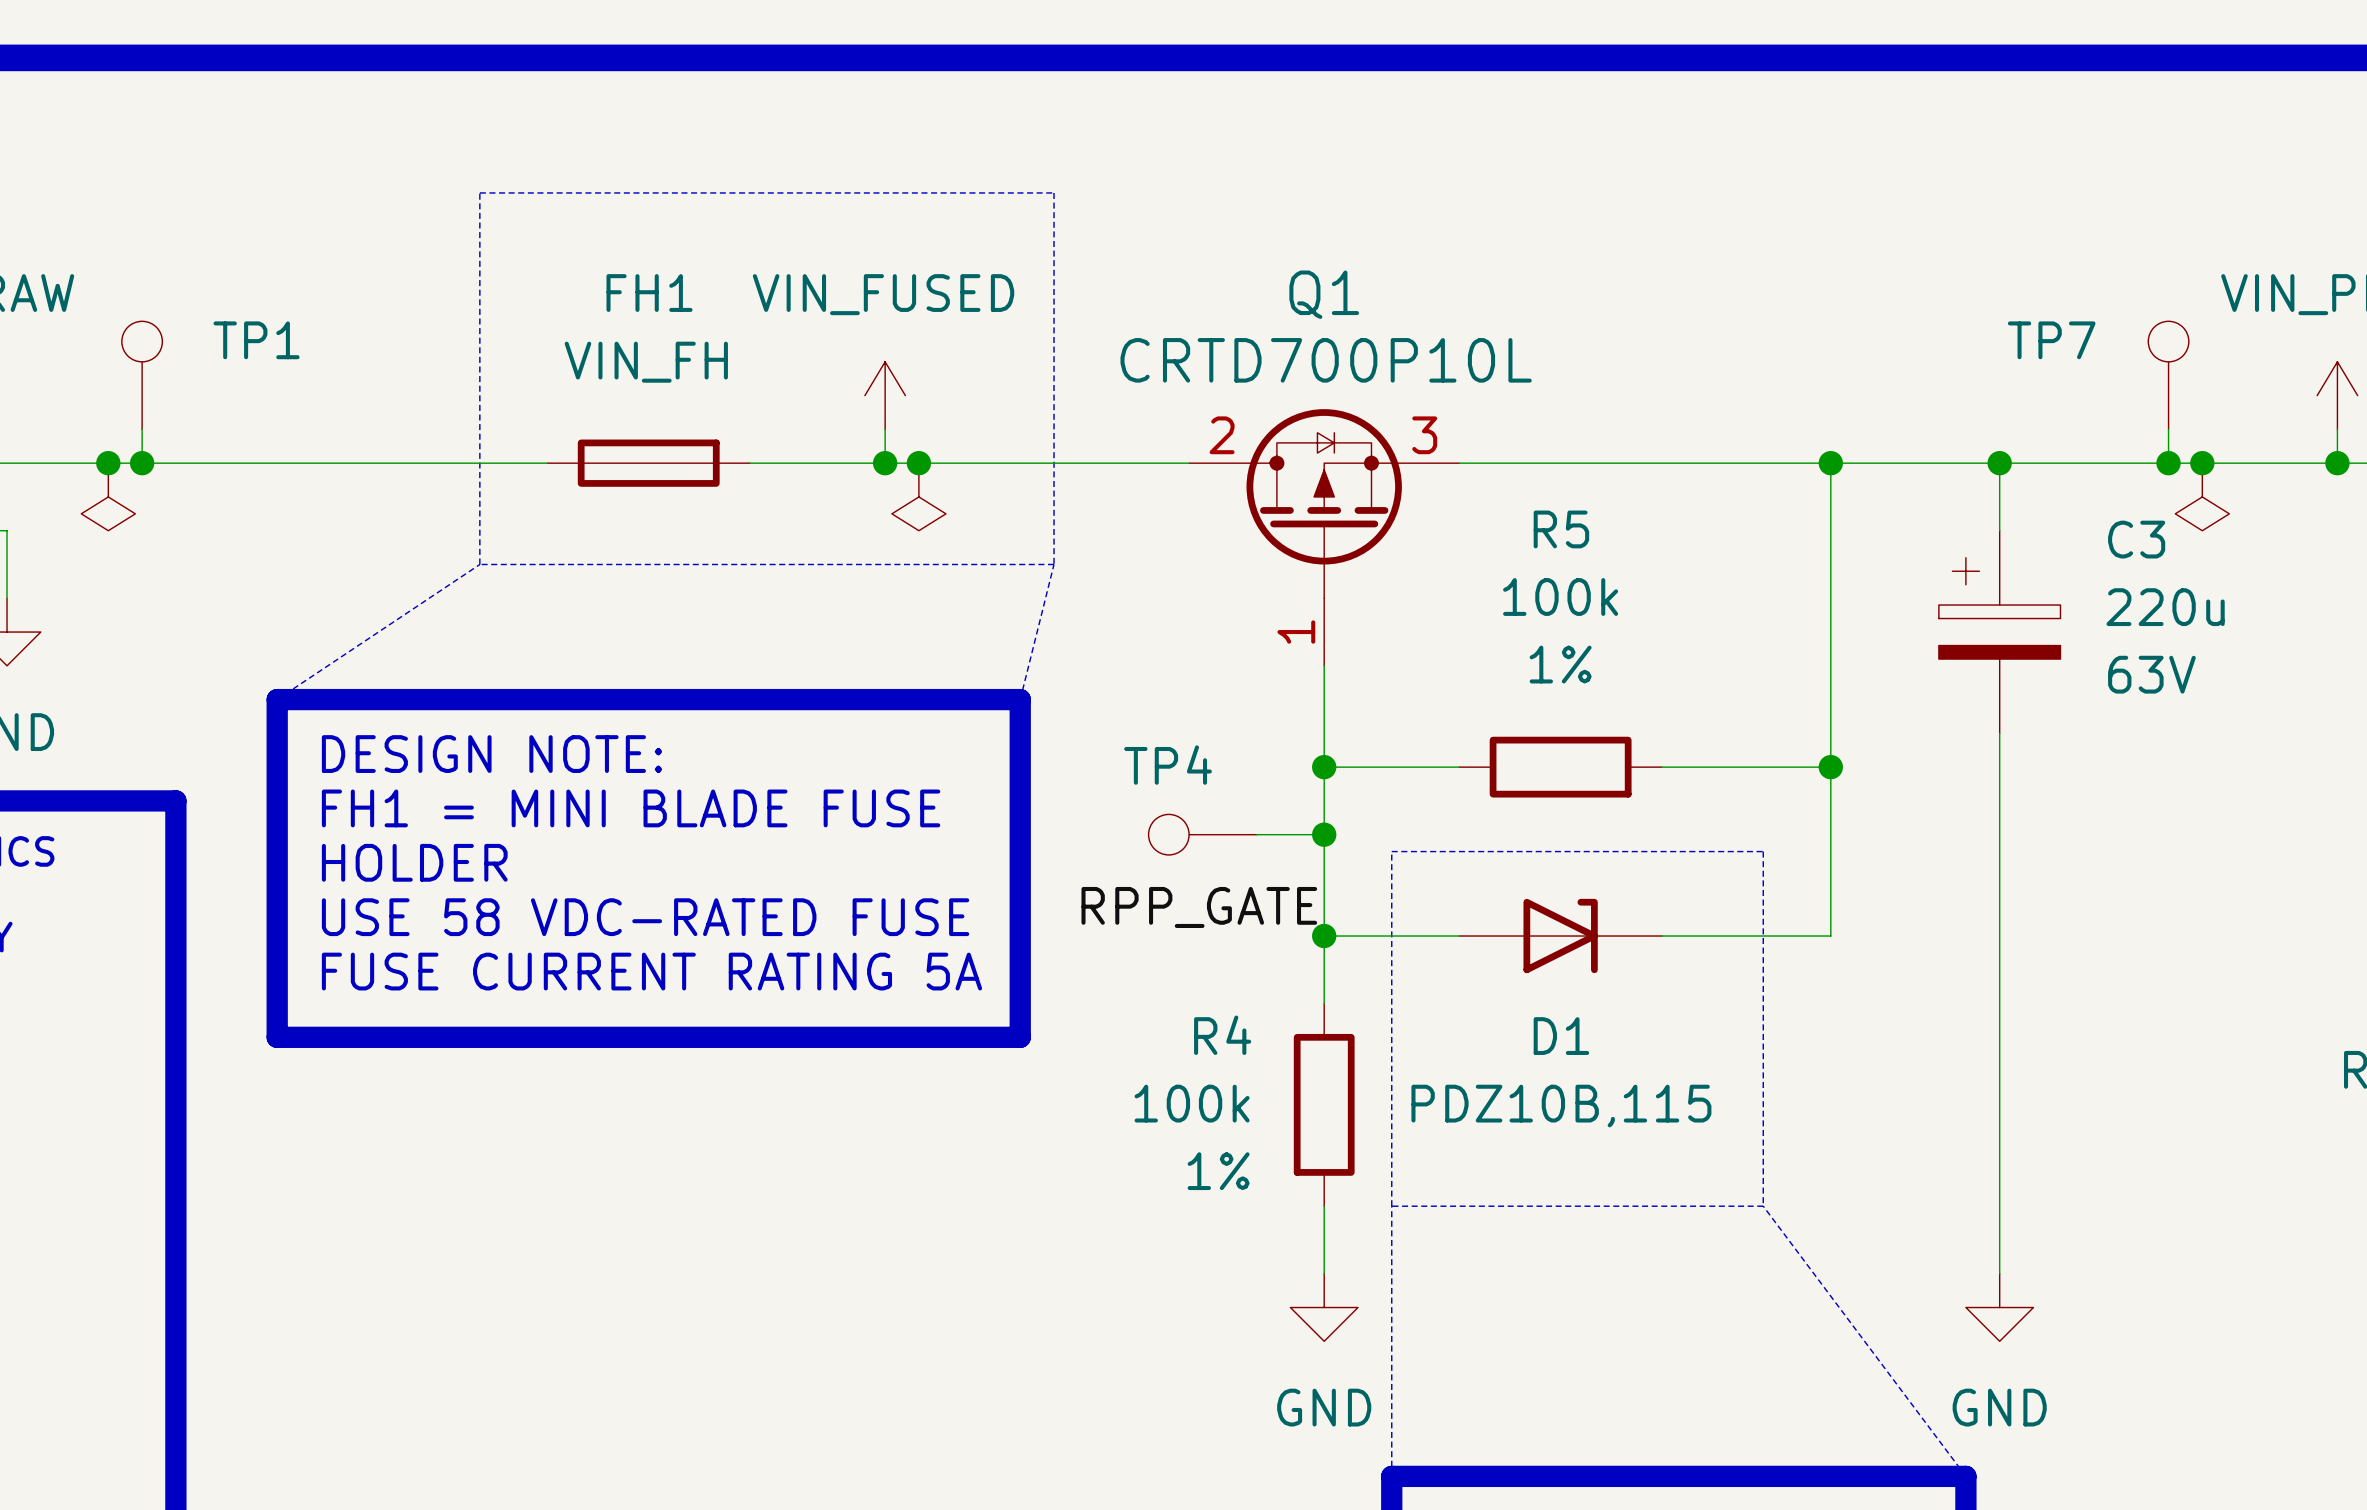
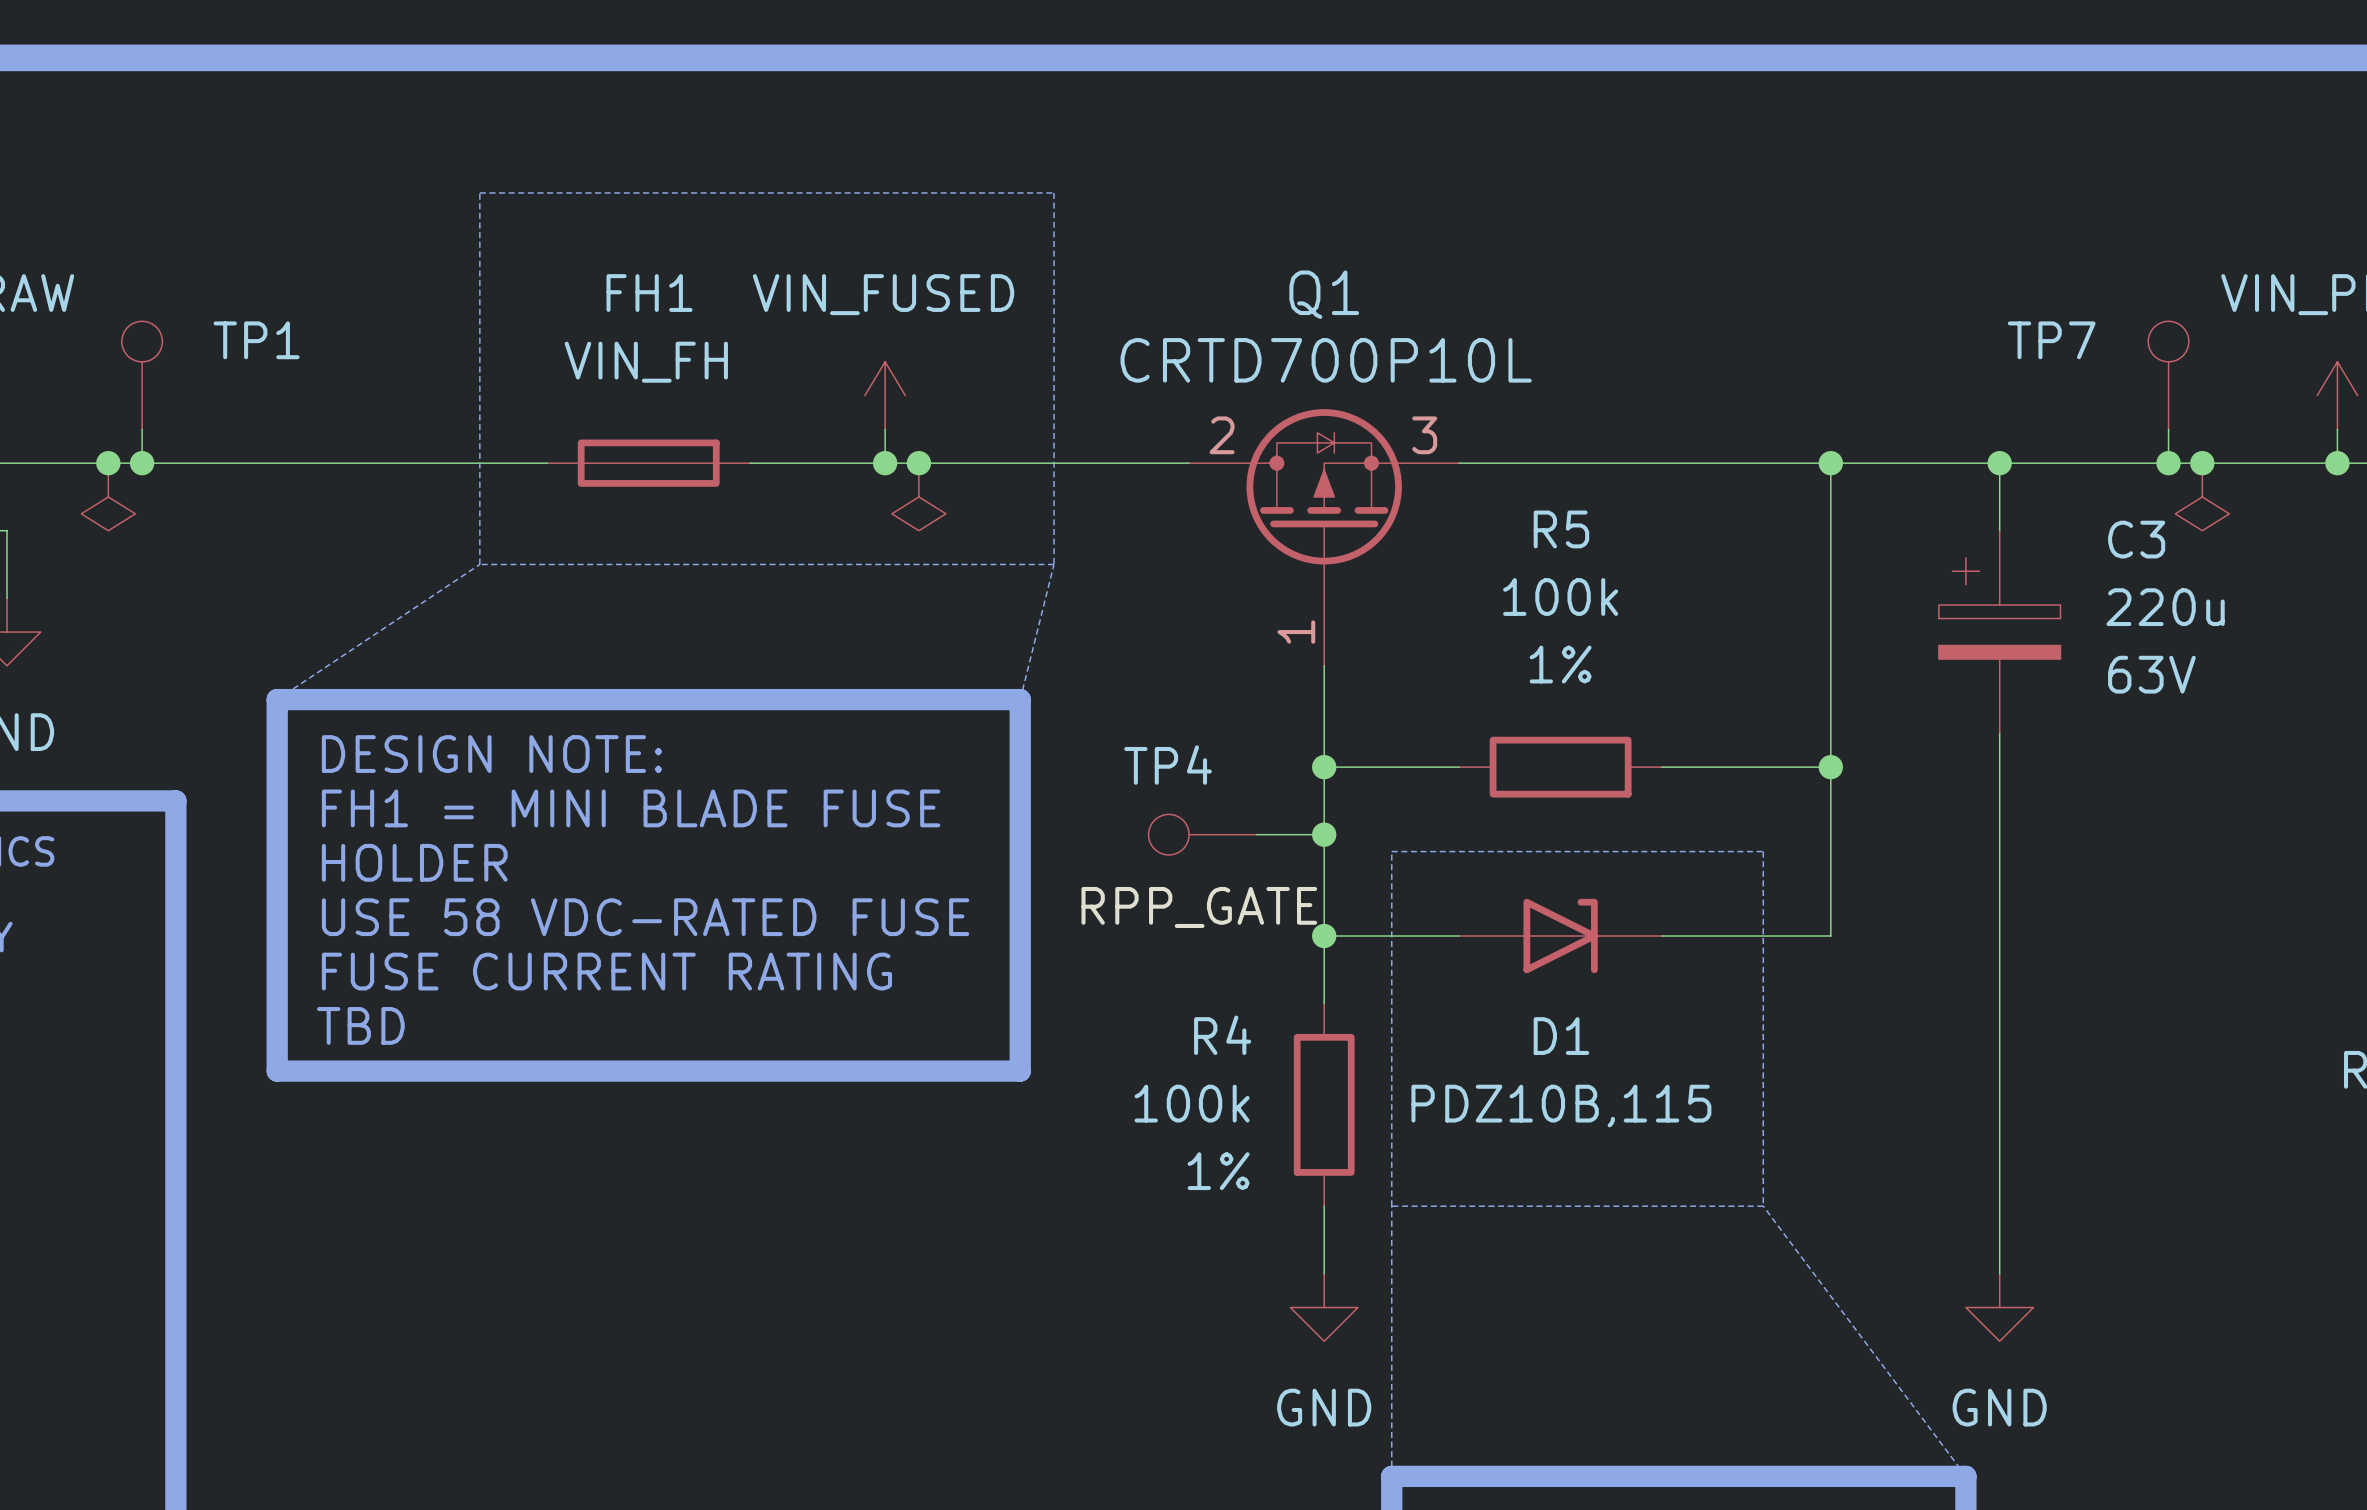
text: FUSE CURRENT RATING 5A (651, 971) -> FUSE CURRENT RATING (606, 971)
text: none -> TBD (360, 1025)
line: (277, 1037) (1020, 1037) -> (277, 1037) (277, 1071) (1020, 1071) (1020, 1037)

